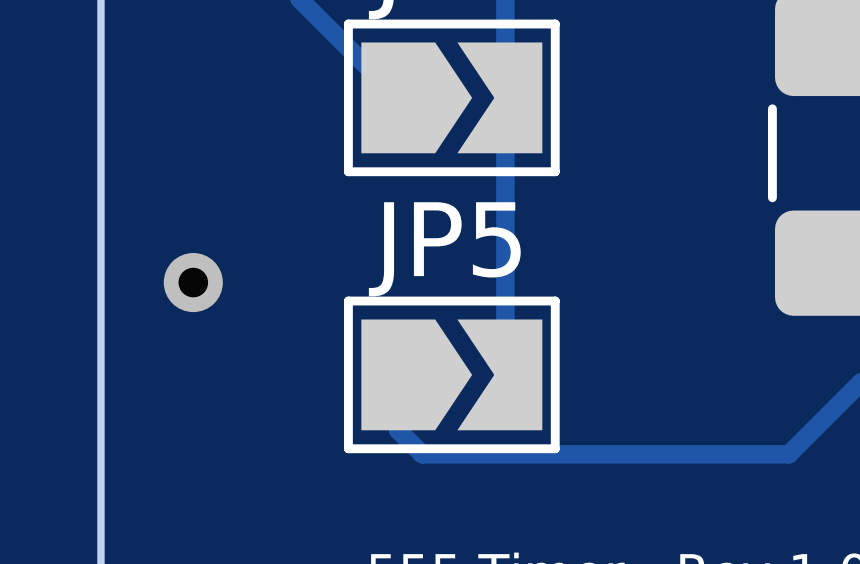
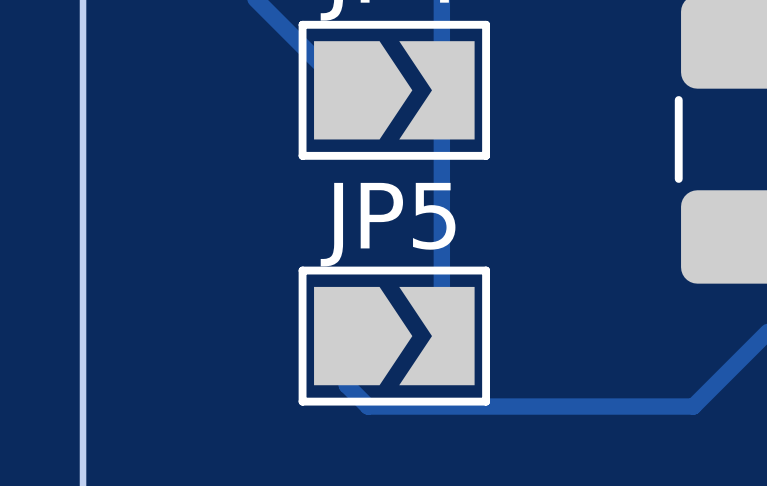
via: (193, 282) -> none

